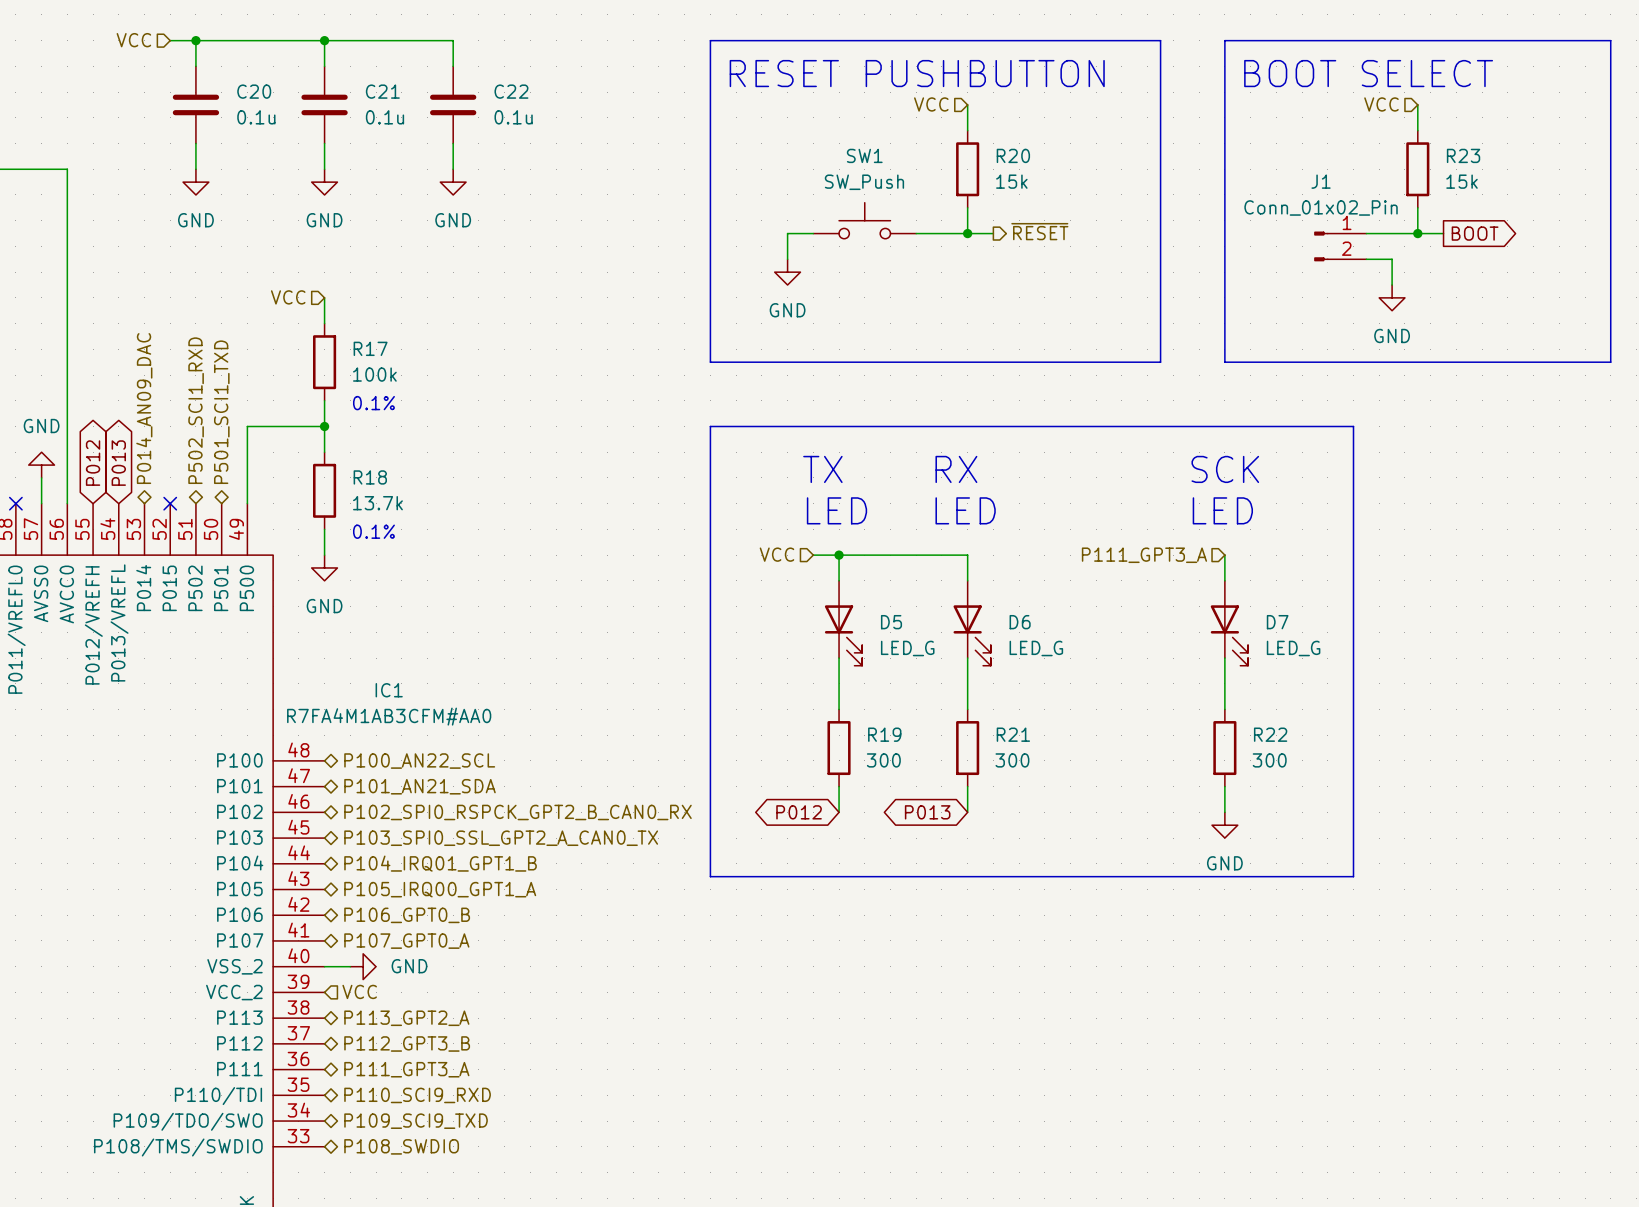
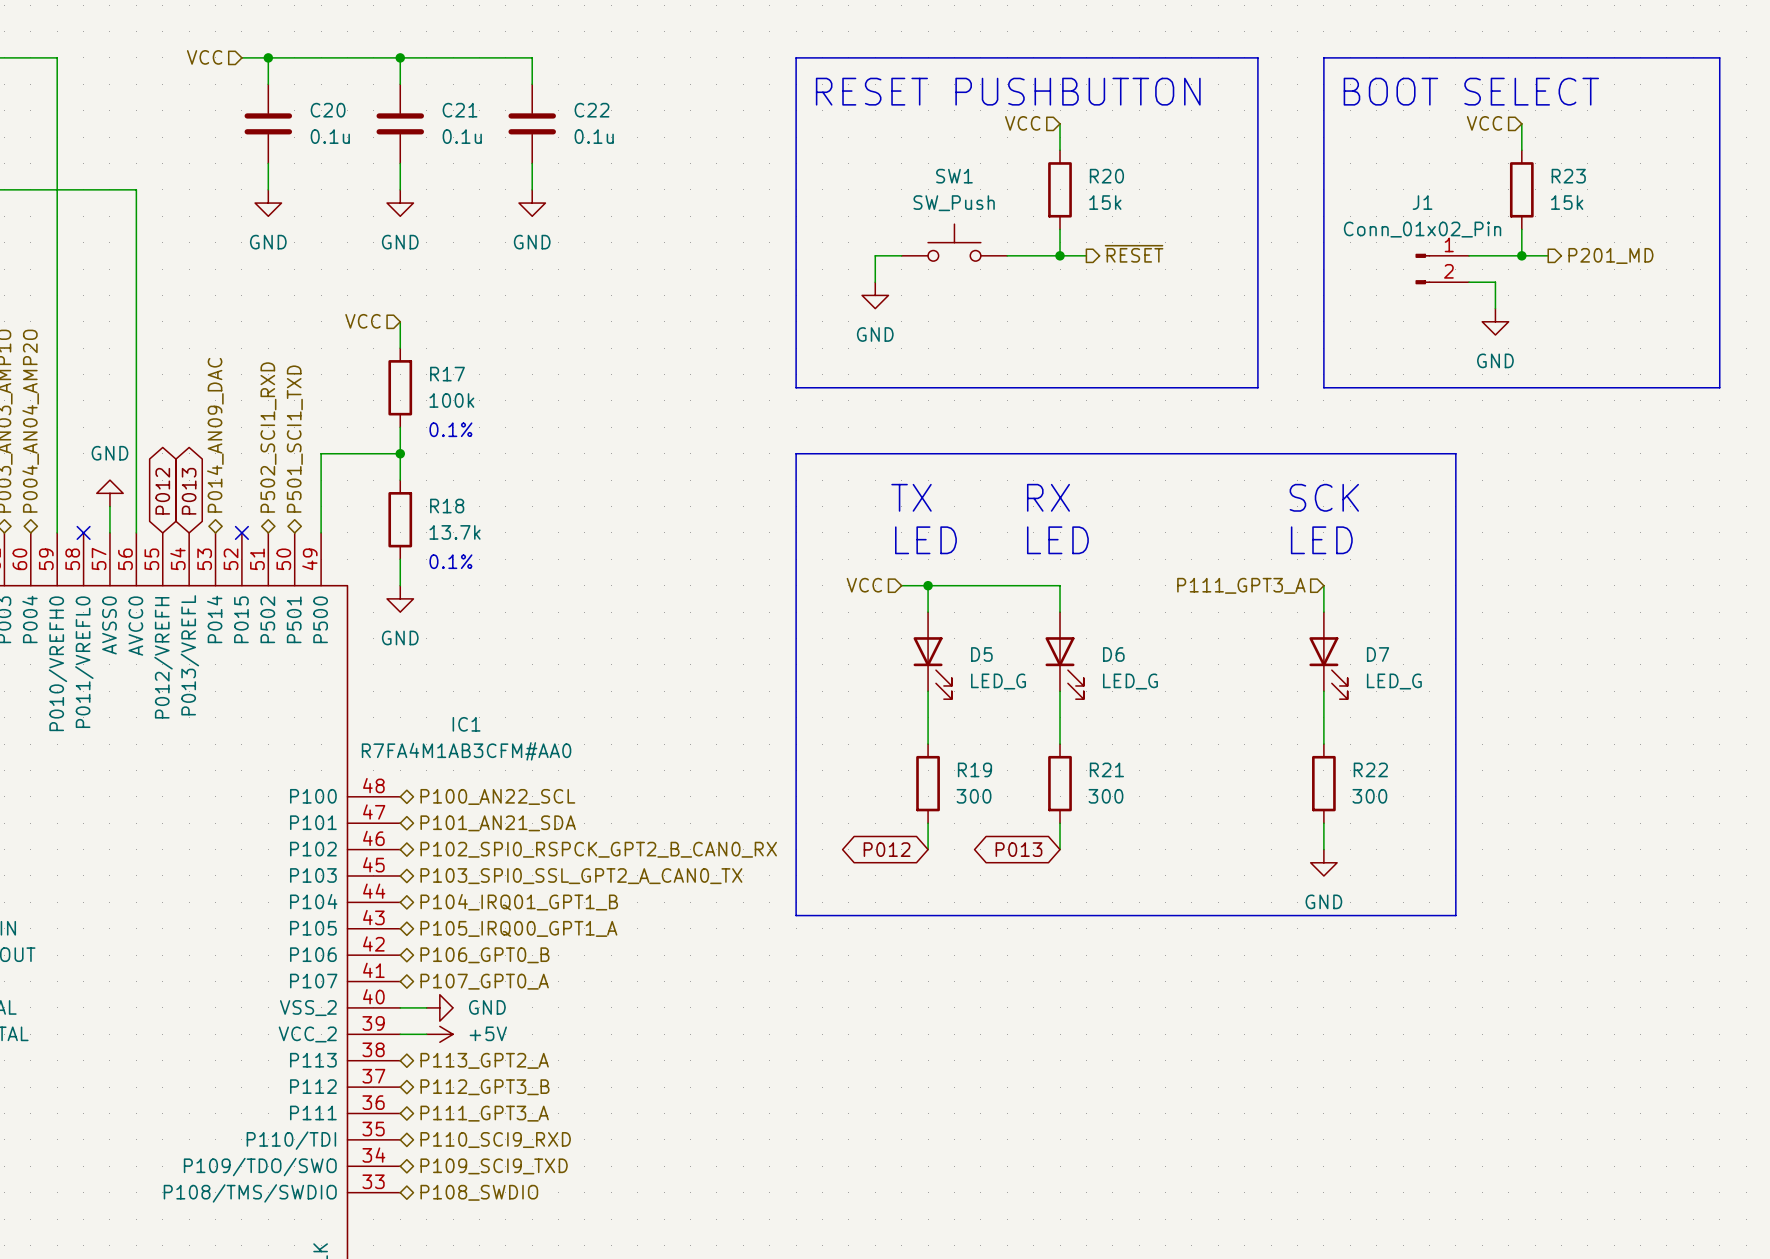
global label: BOOT (1475, 233) -> none
hierarchical label: none -> P201_MD (1610, 255)
hierarchical label: VCC (359, 991) -> none
wire: none -> (400, 1034) (426, 1034)
power symbol: none -> +5V (439, 1034)

